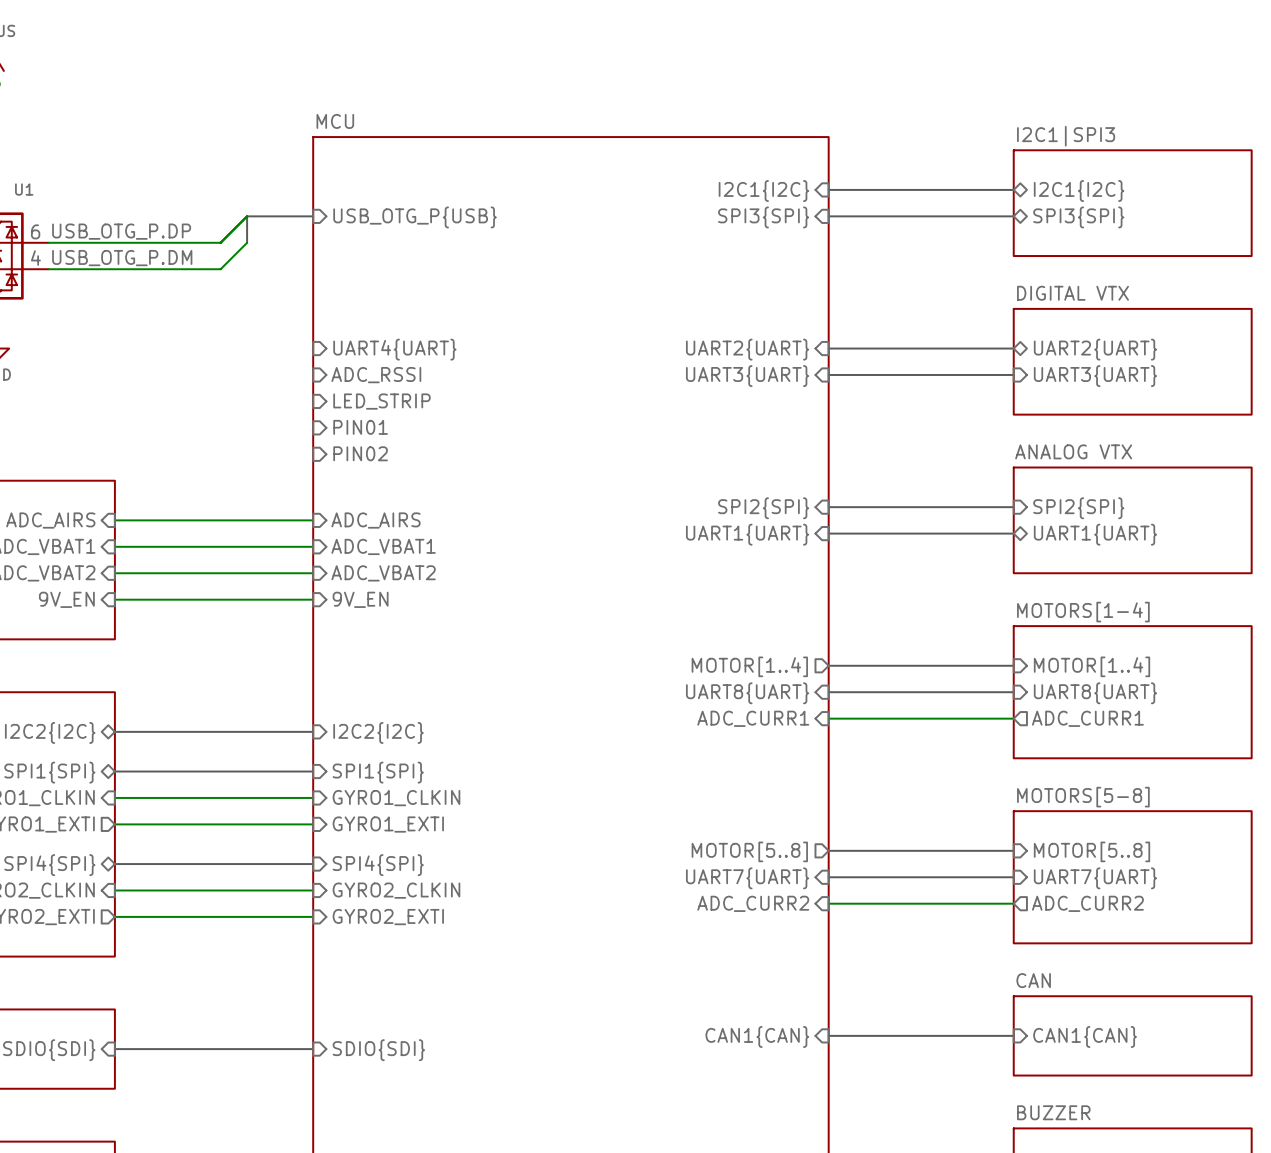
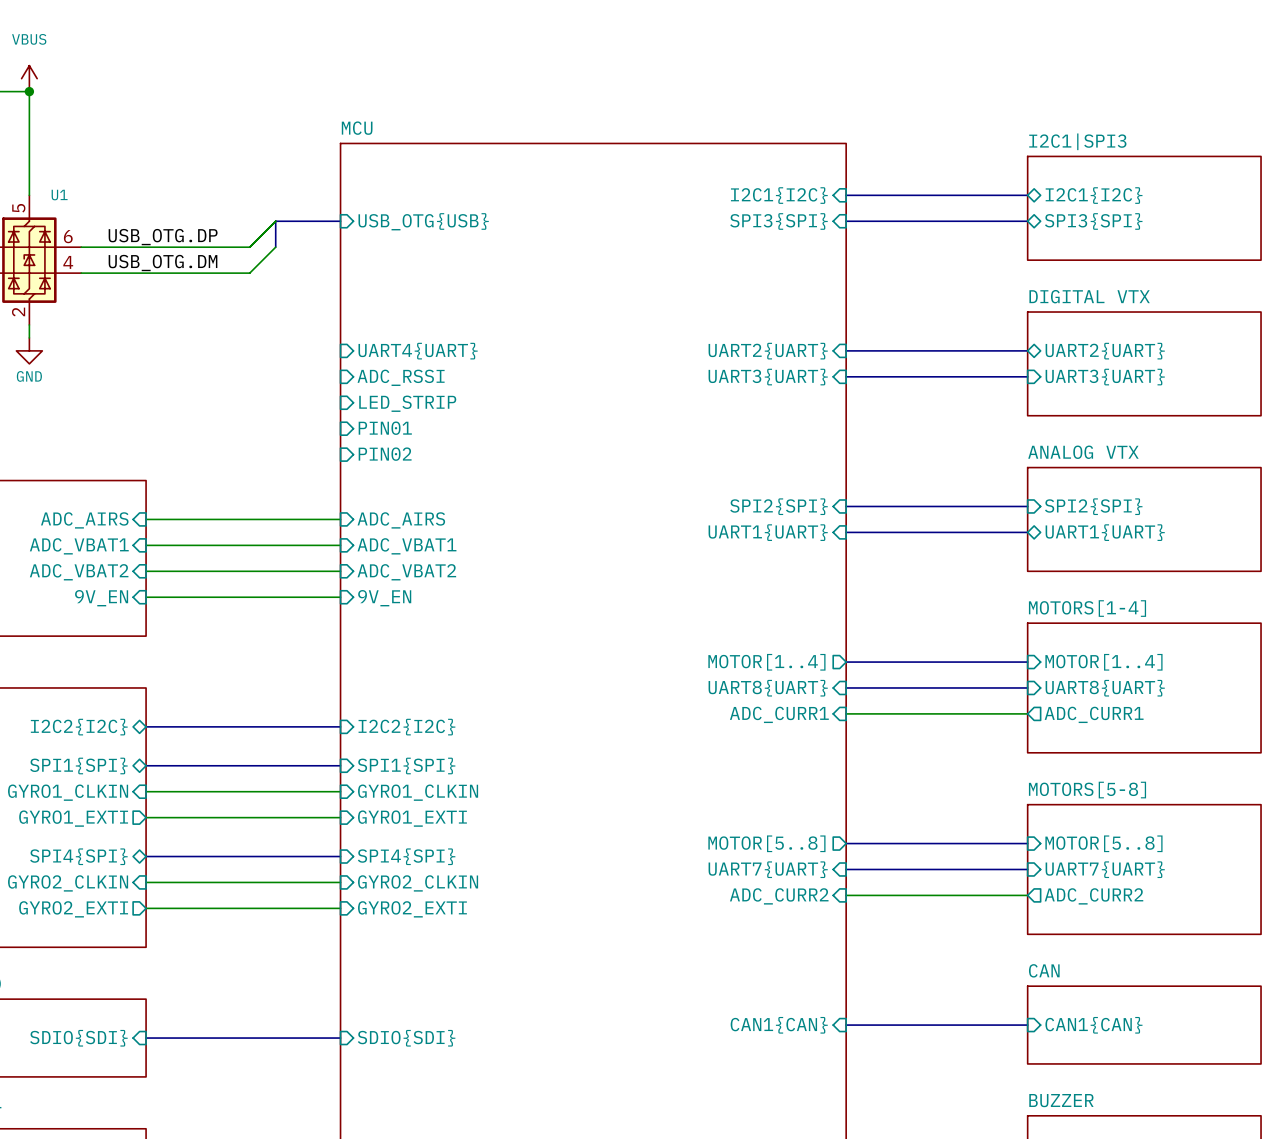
sheet pin: USB_OTG_P{USB} (415, 217) -> USB_OTG{USB} (423, 221)
label: USB_OTG_P.DP (121, 231) -> none
label: none -> USB_OTG.DP (163, 237)
label: USB_OTG_P.DM (122, 258) -> none
label: none -> USB_OTG.DM (163, 263)

